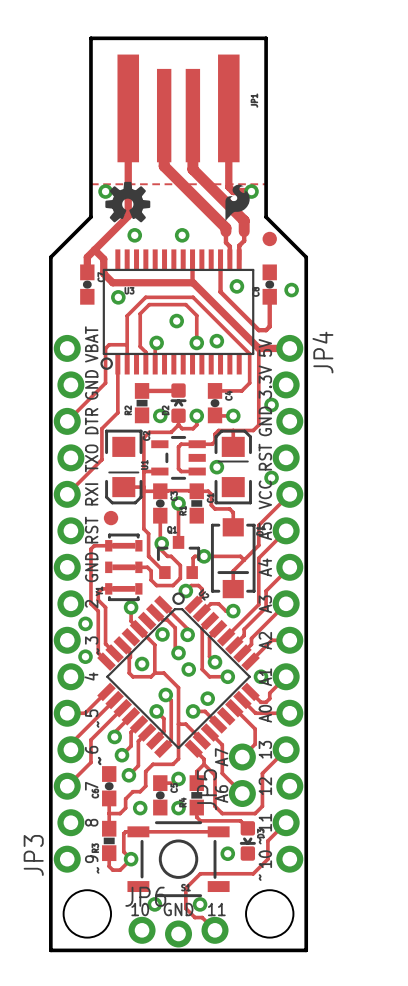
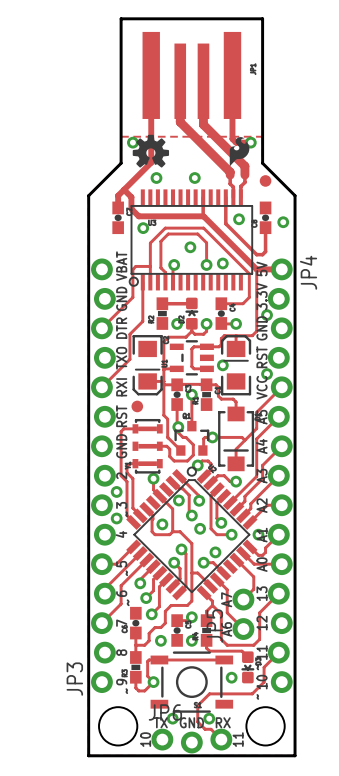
text: 10 (140, 909) -> TX (160, 722)
text: 11 (216, 909) -> RX (223, 722)
text: none -> 10 (145, 739)
text: none -> 11 (238, 739)

